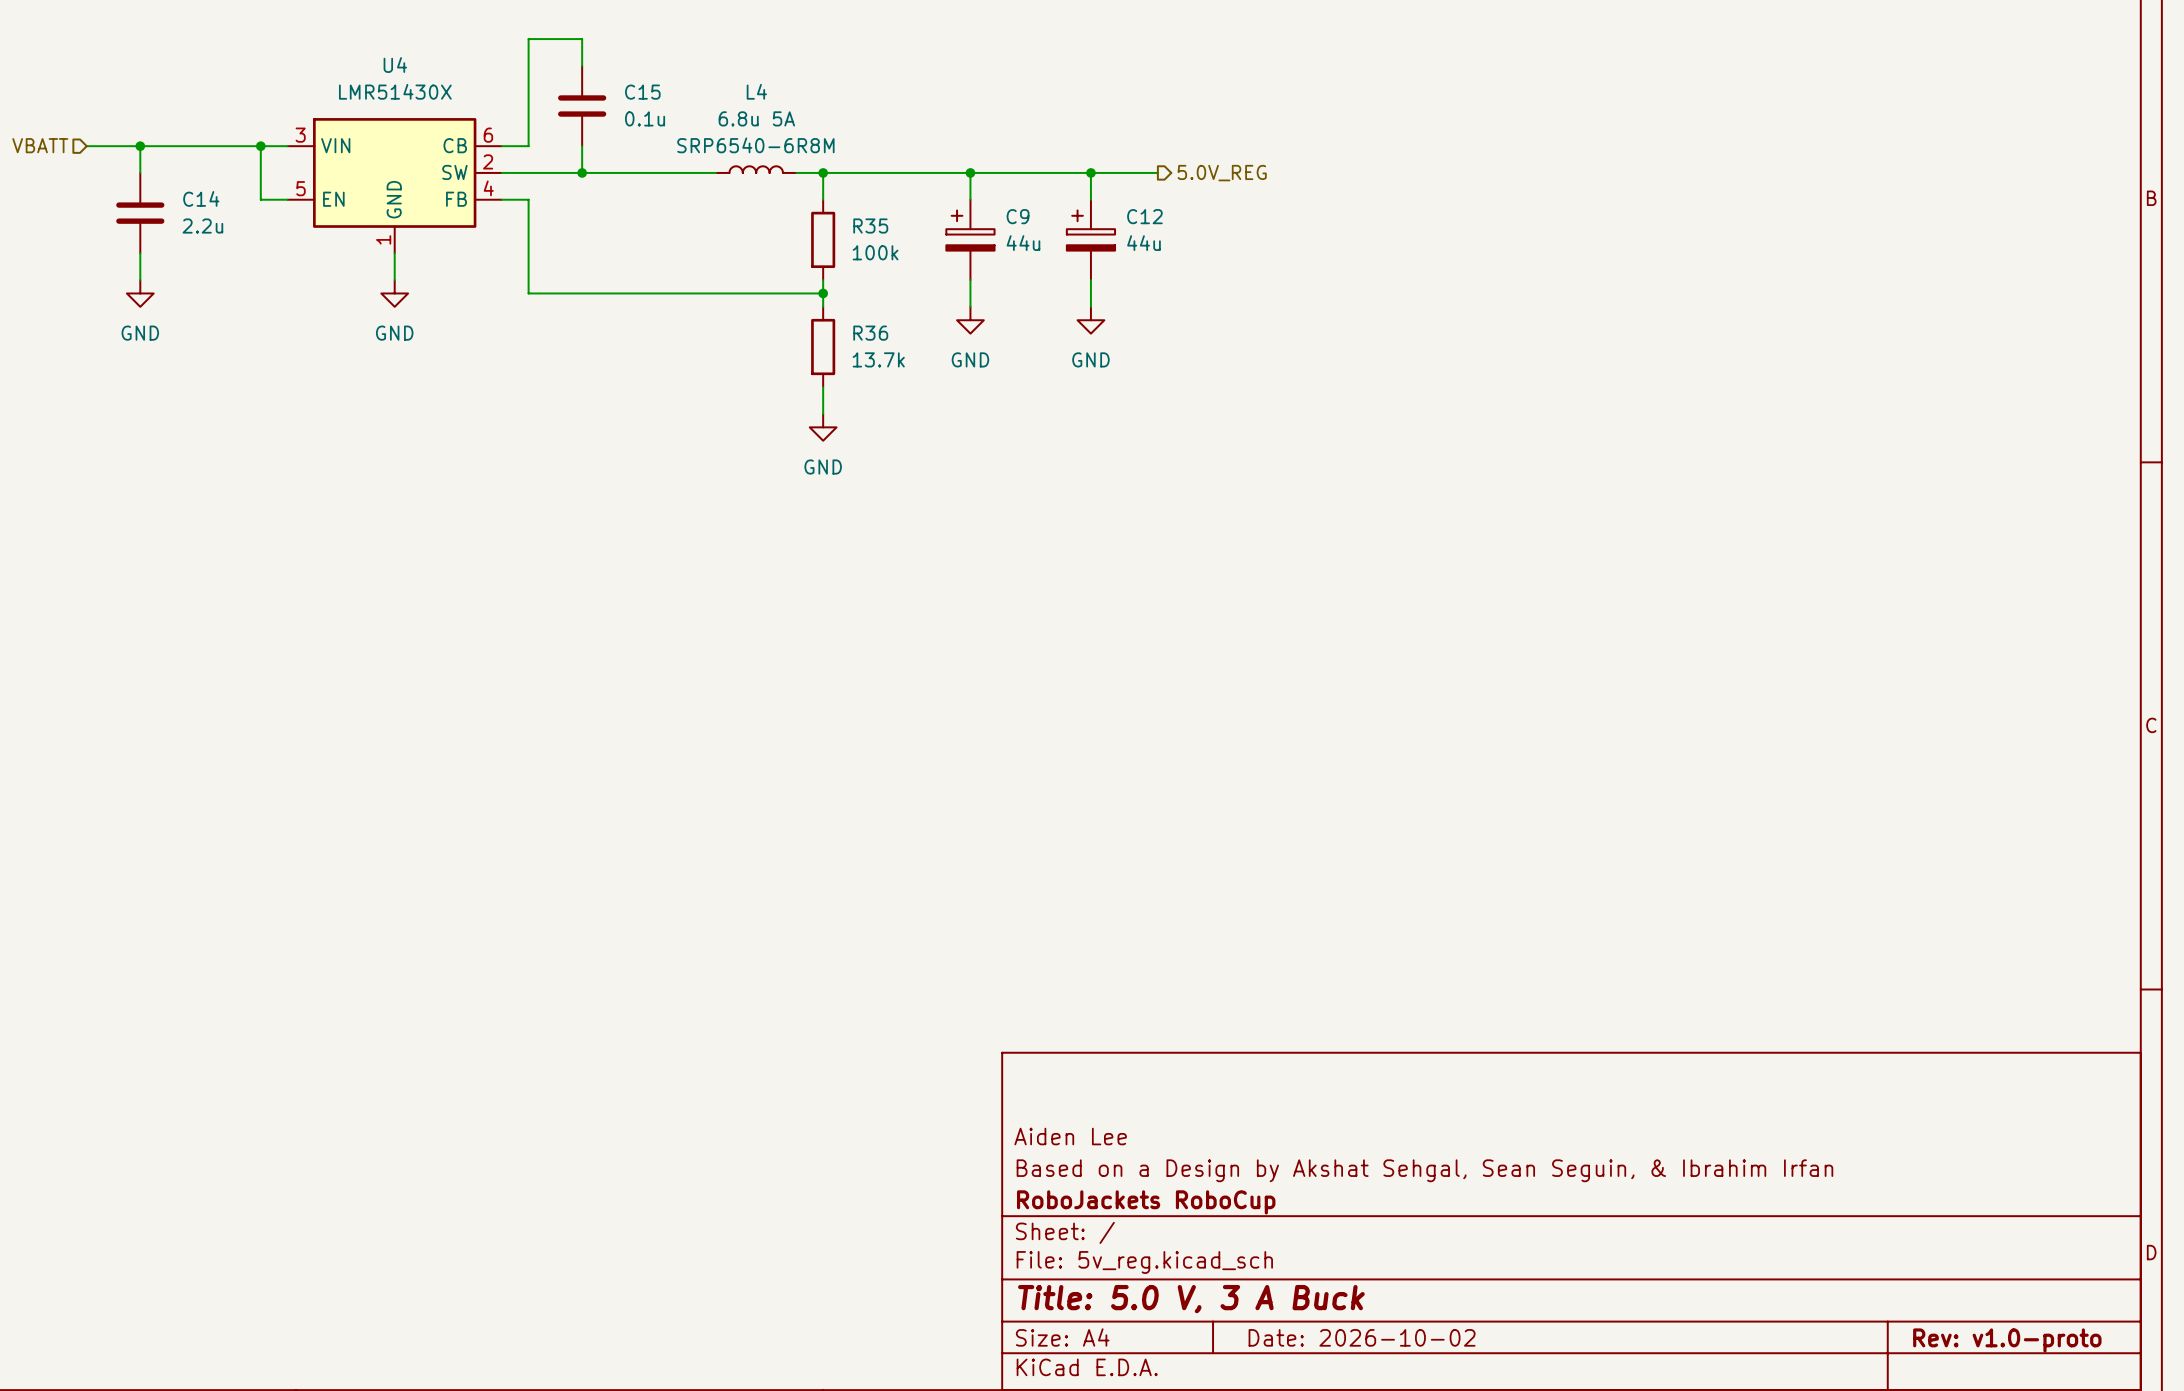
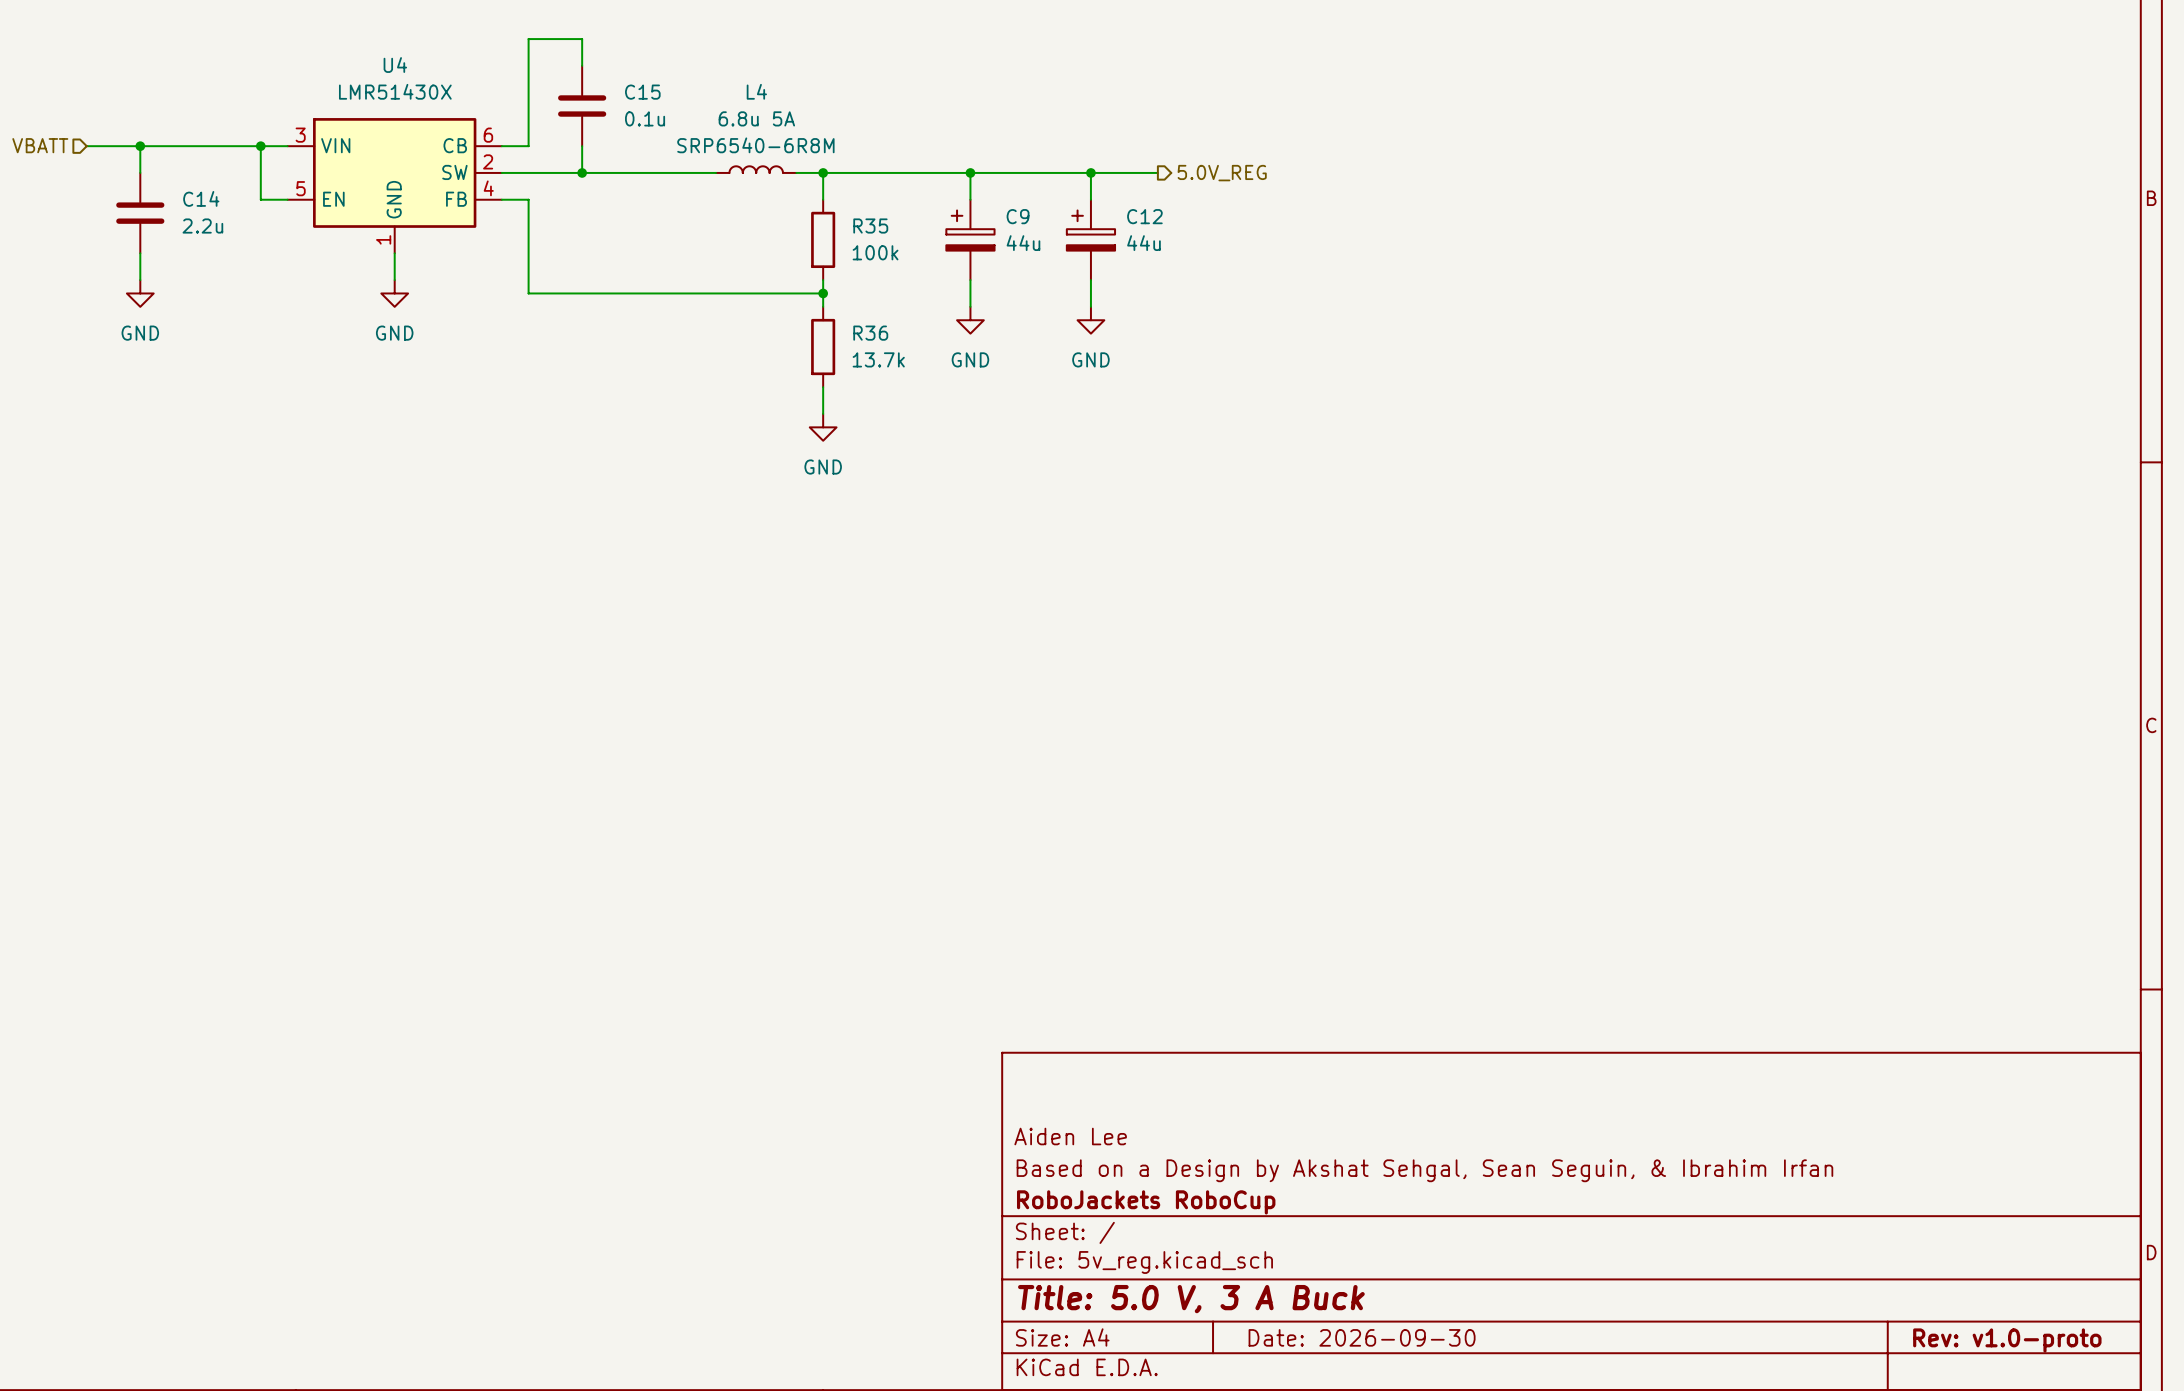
title block: Date: 2026-10-02 (1362, 1337) -> Date: 2026-09-30 (1362, 1337)

